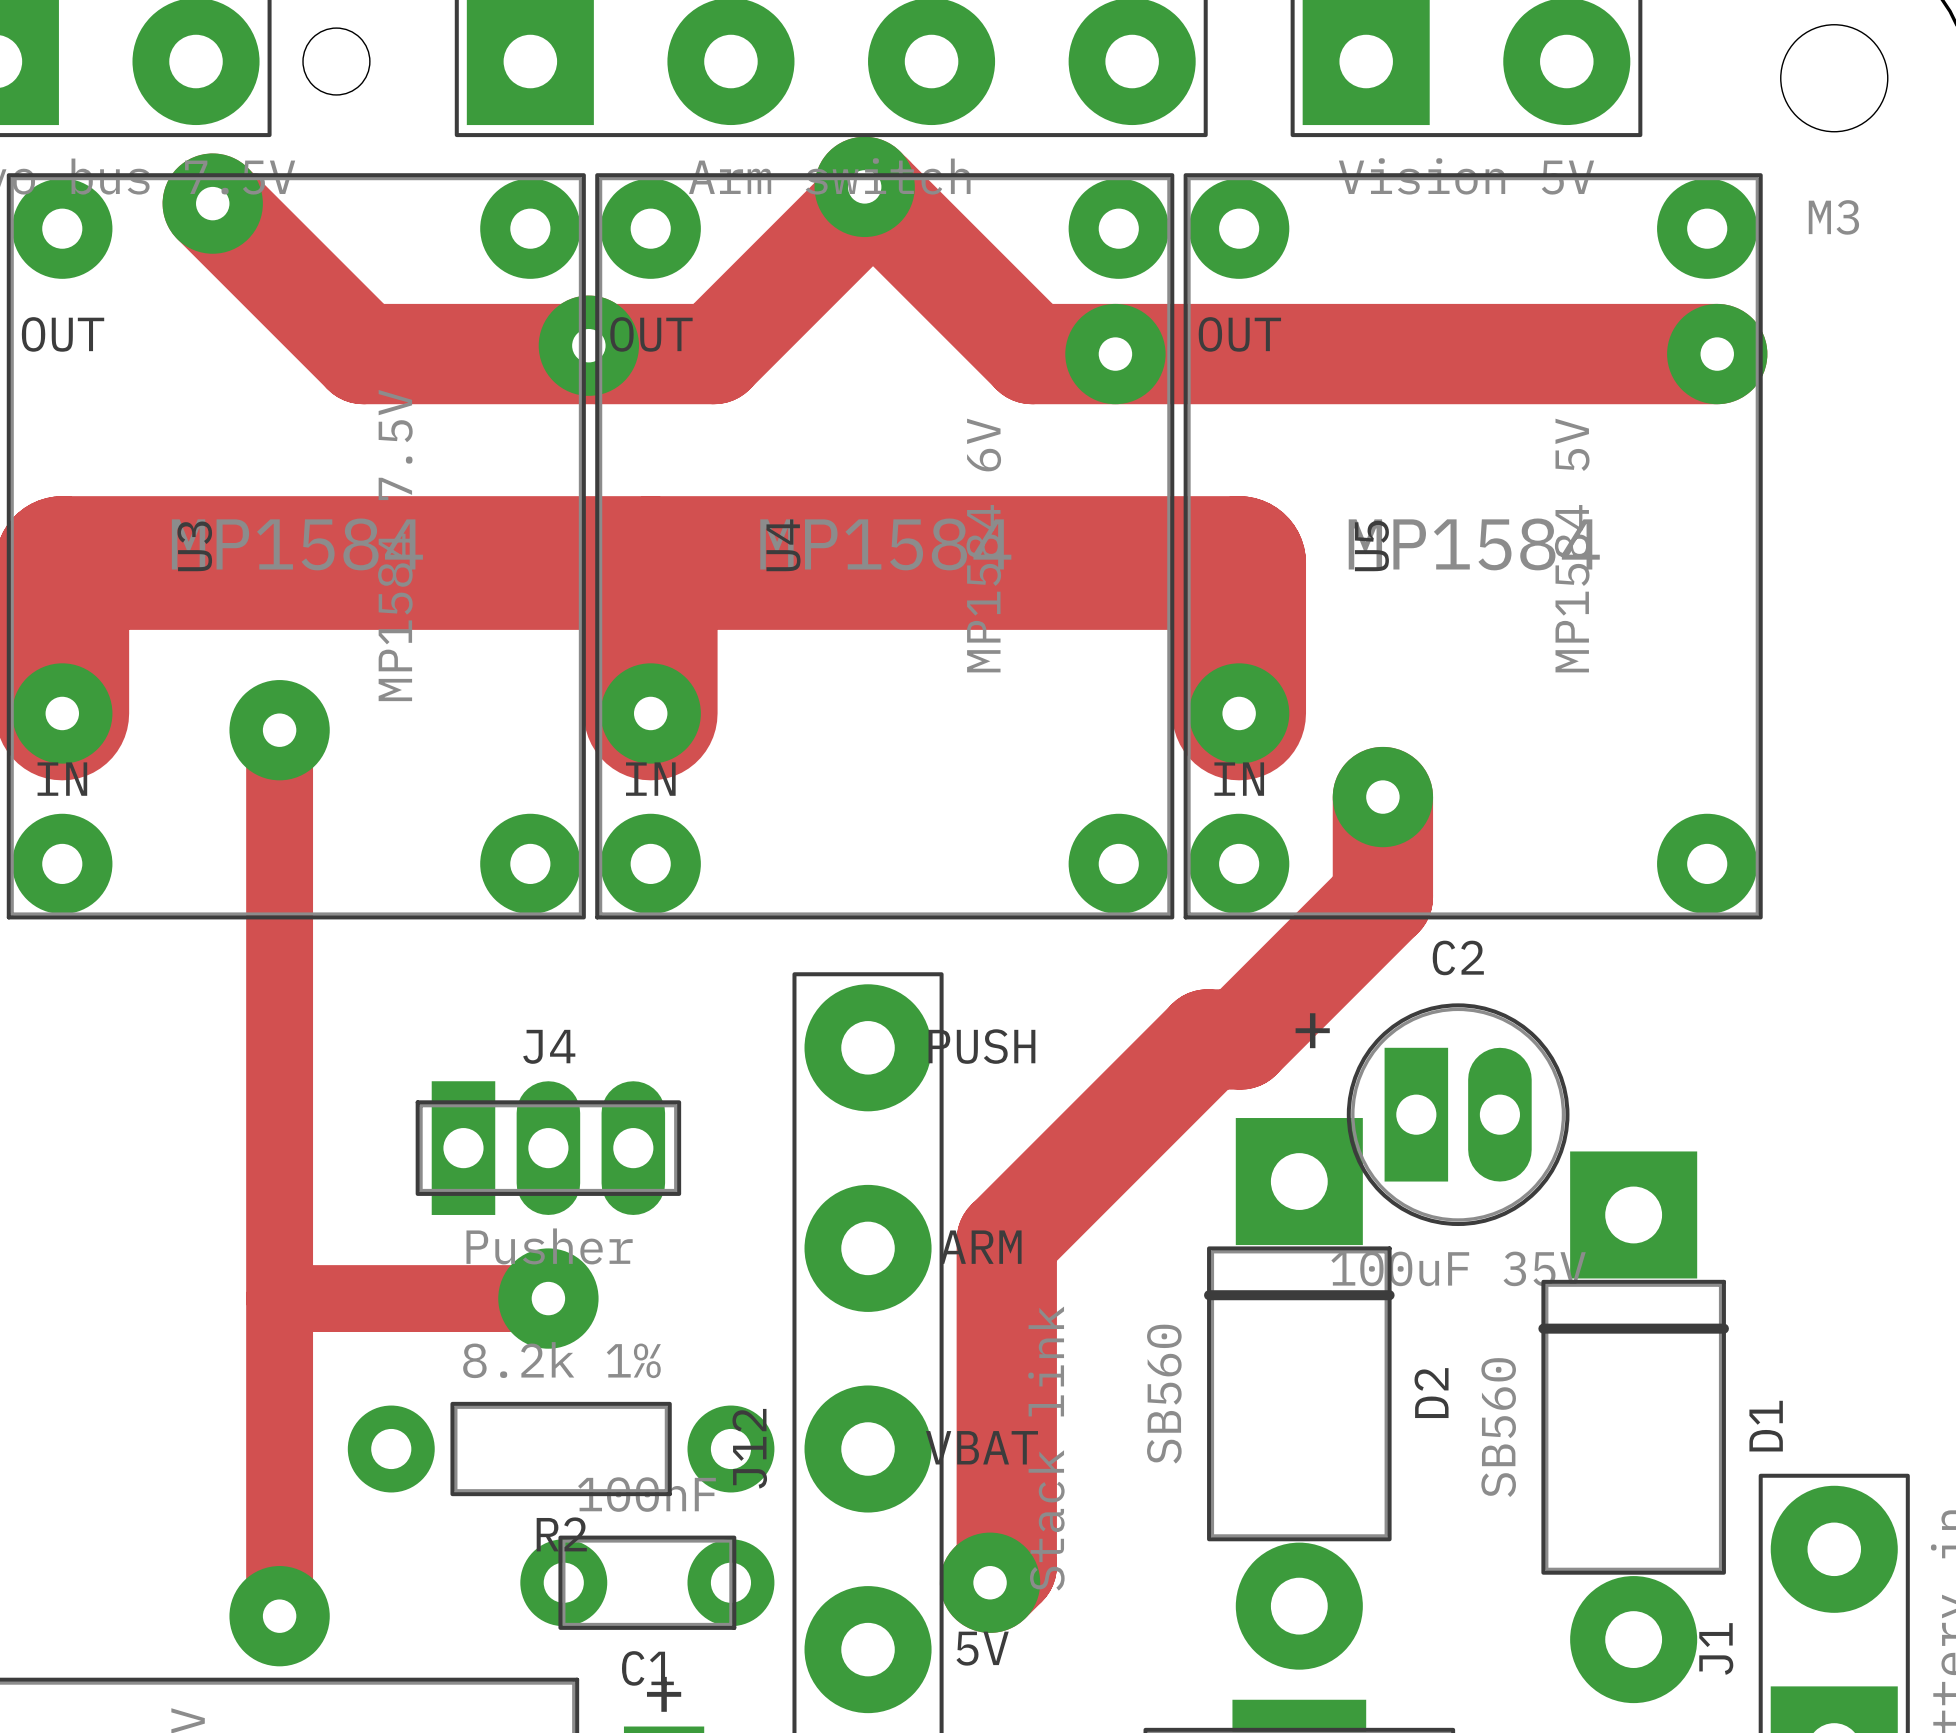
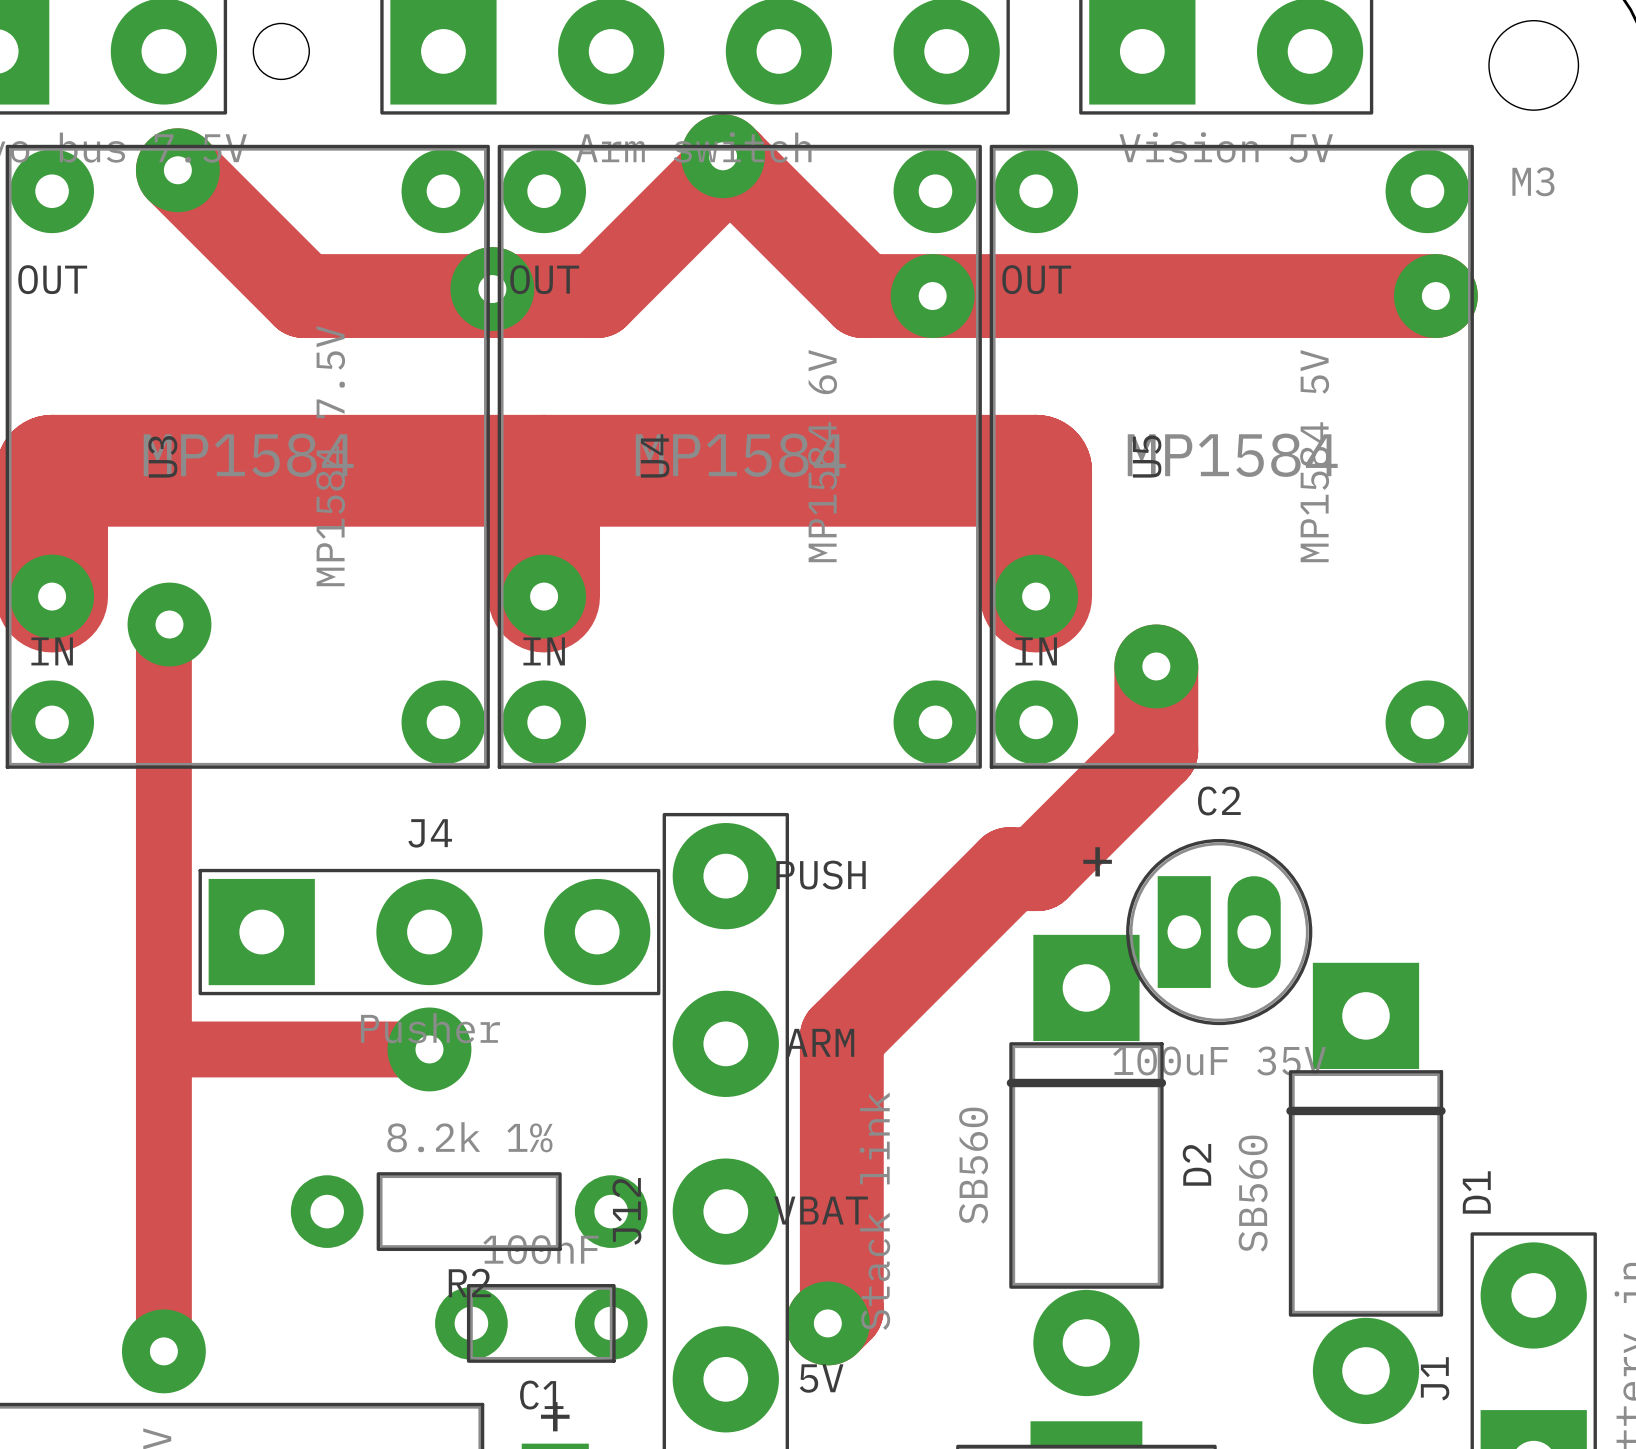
track: (279, 730) (279, 1616) -> none
via position: (279, 730) -> (169, 624)
track: none -> (169, 624) (163, 652) (163, 1351)
J4 footprint: [415, 1081, 682, 1215] -> [198, 868, 661, 996]
track: none -> (163, 1049) (429, 1049)
track: (279, 1298) (548, 1298) -> none
via position: (548, 1298) -> (429, 1049)
via position: (279, 1616) -> (163, 1351)

